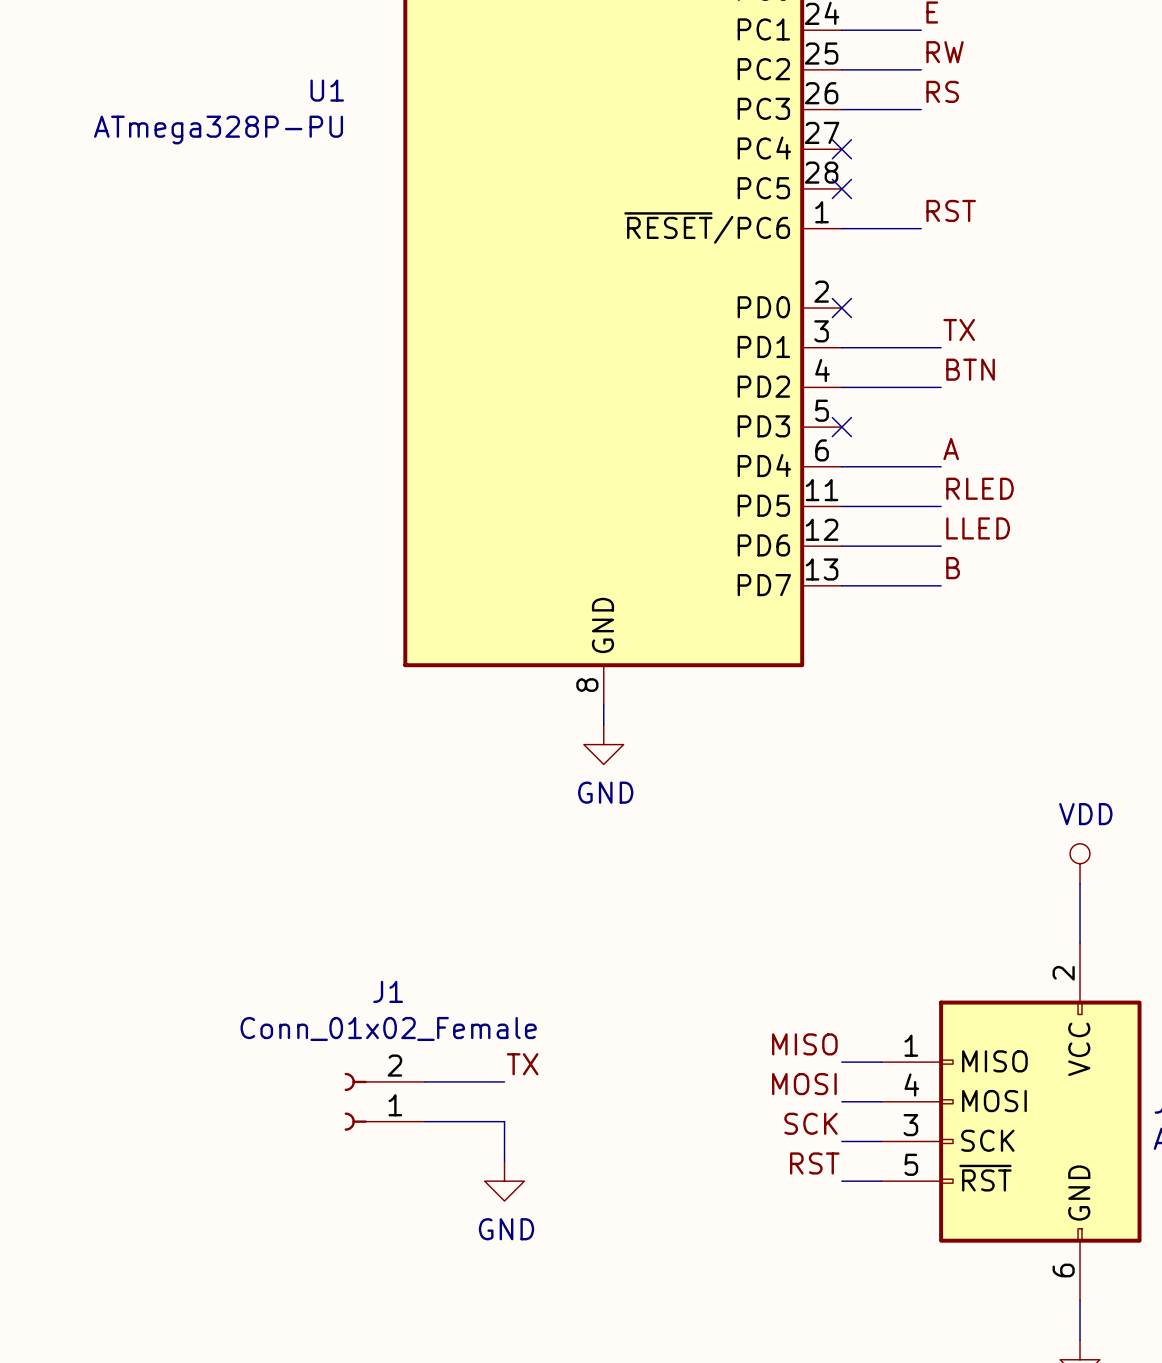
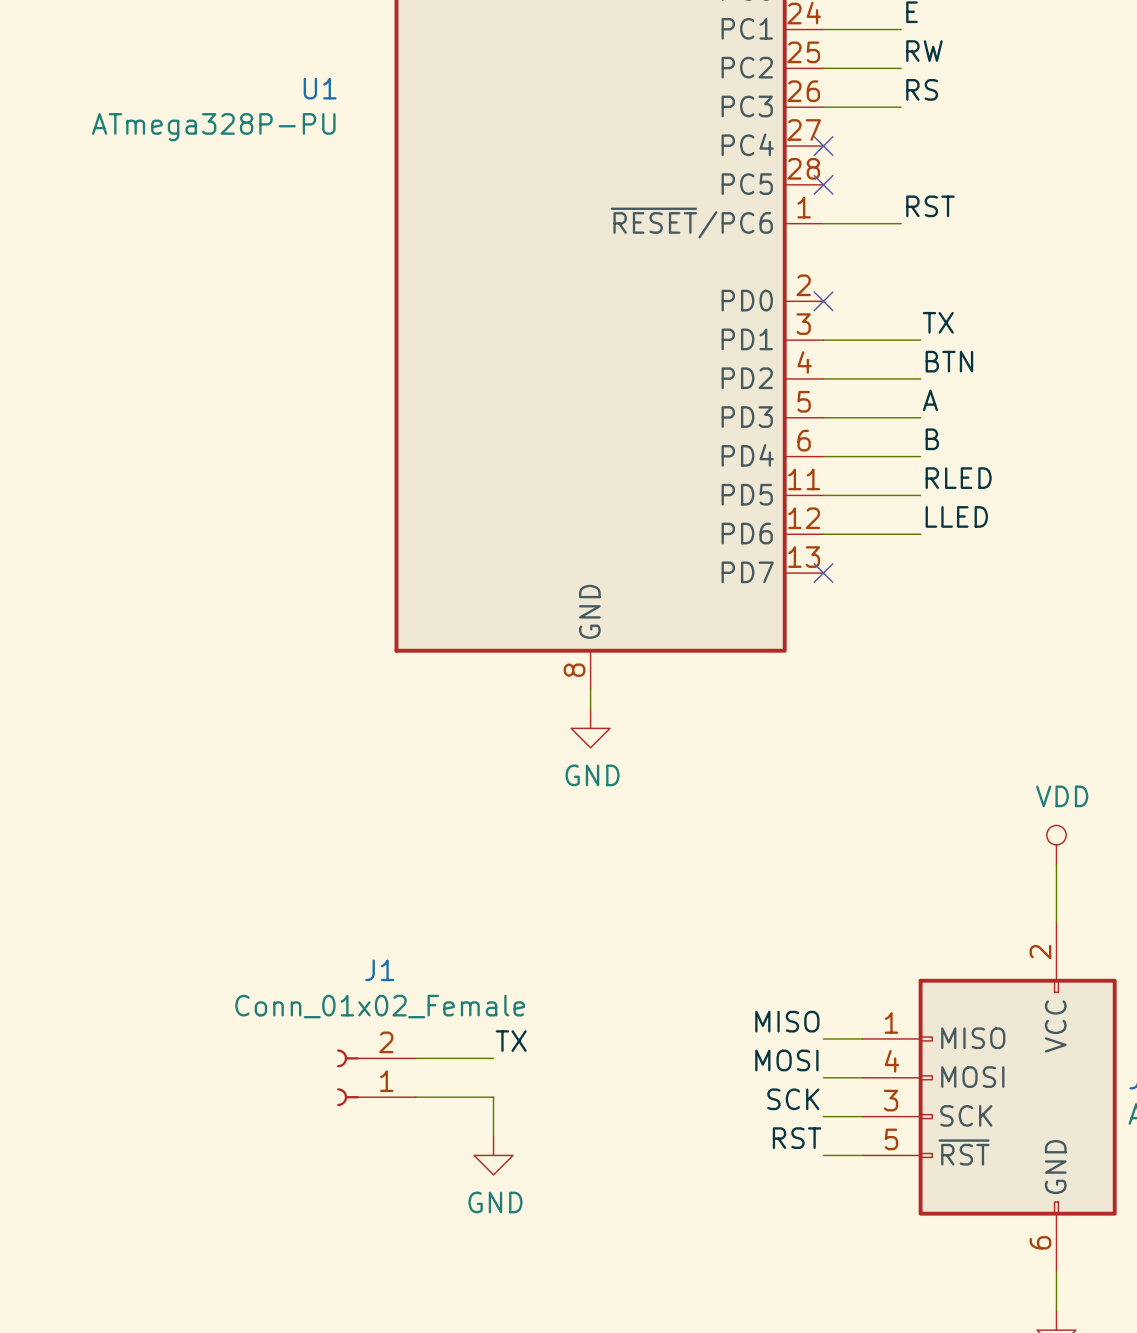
label: none -> A (930, 400)
no-connect mark: (841, 427) -> none
label: A (951, 449) -> B (932, 439)
label: B (953, 568) -> none
wire: (841, 585) (941, 585) -> (823, 417) (920, 417)
no-connect mark: none -> (823, 573)

